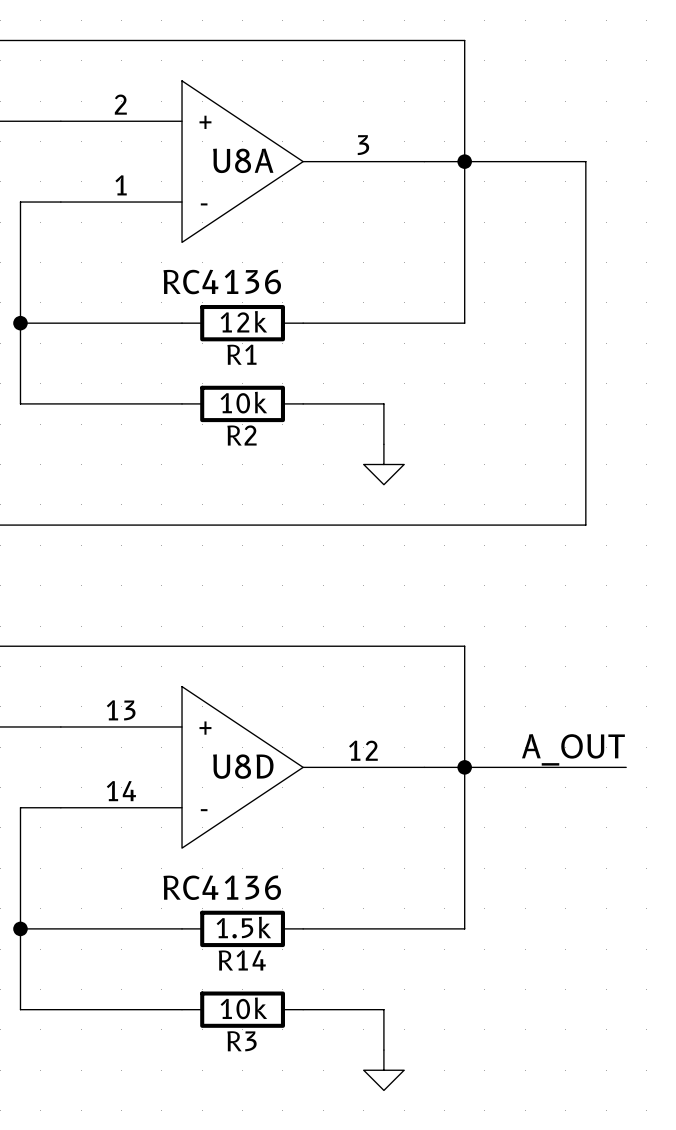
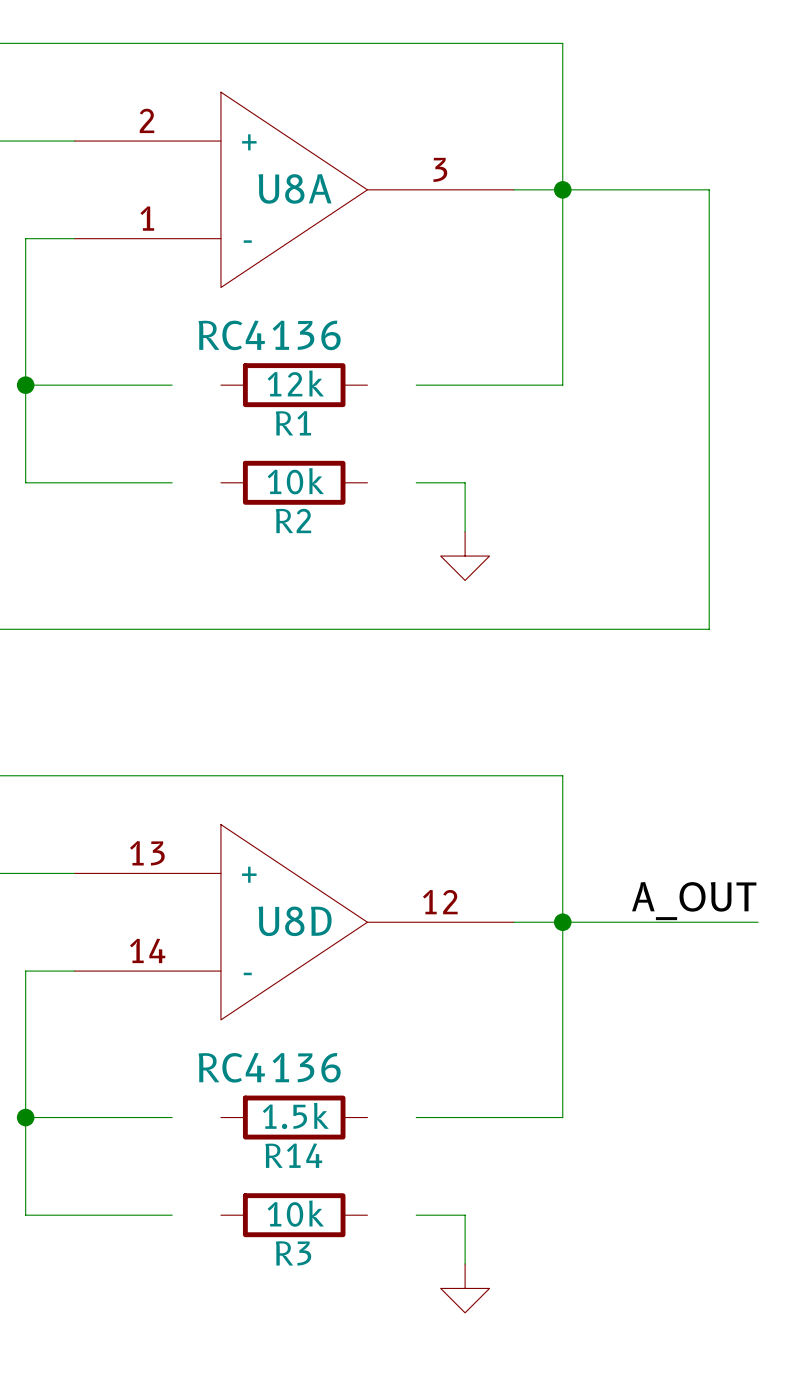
wire: (141, 323) (182, 323) -> none
wire: (303, 323) (343, 323) -> none
wire: (141, 403) (182, 403) -> none
wire: (303, 403) (343, 403) -> none
wire: (141, 928) (182, 928) -> none
wire: (303, 928) (343, 928) -> none
wire: (141, 1009) (182, 1009) -> none
wire: (303, 1009) (343, 1009) -> none

